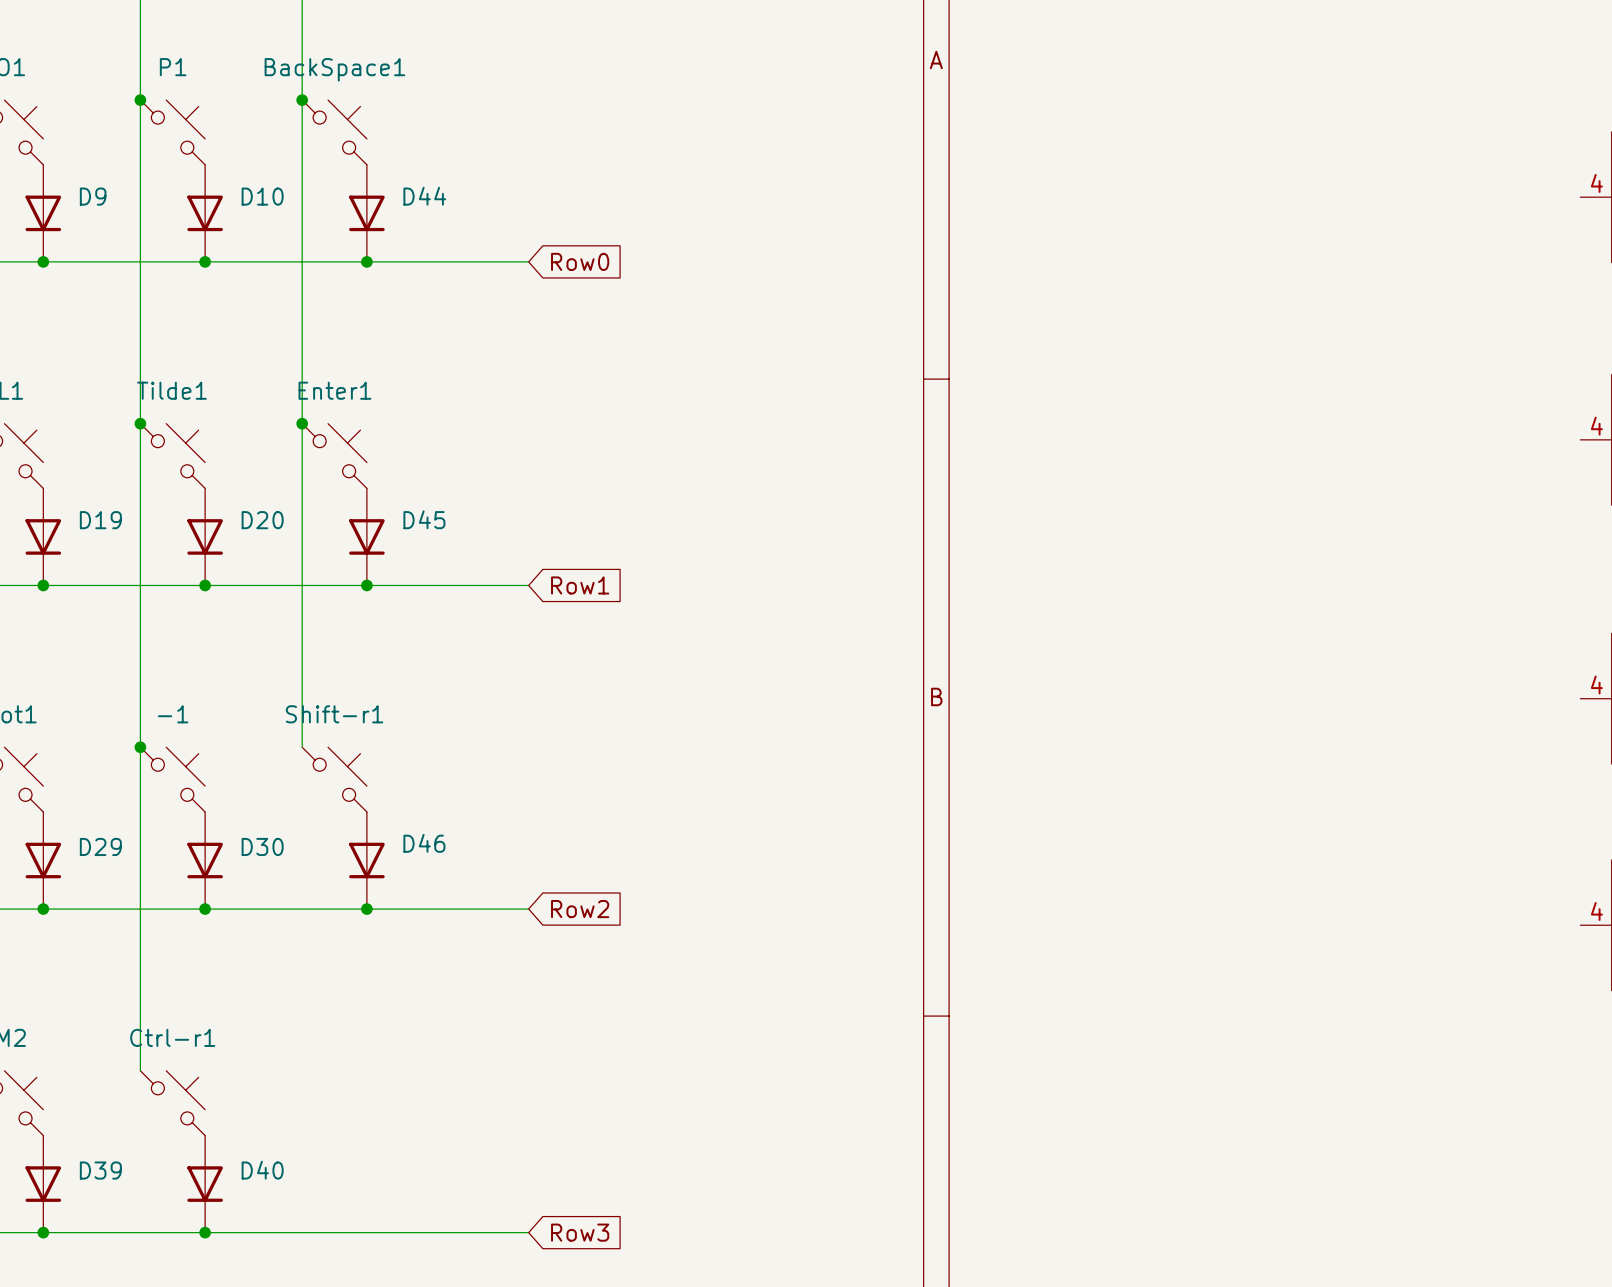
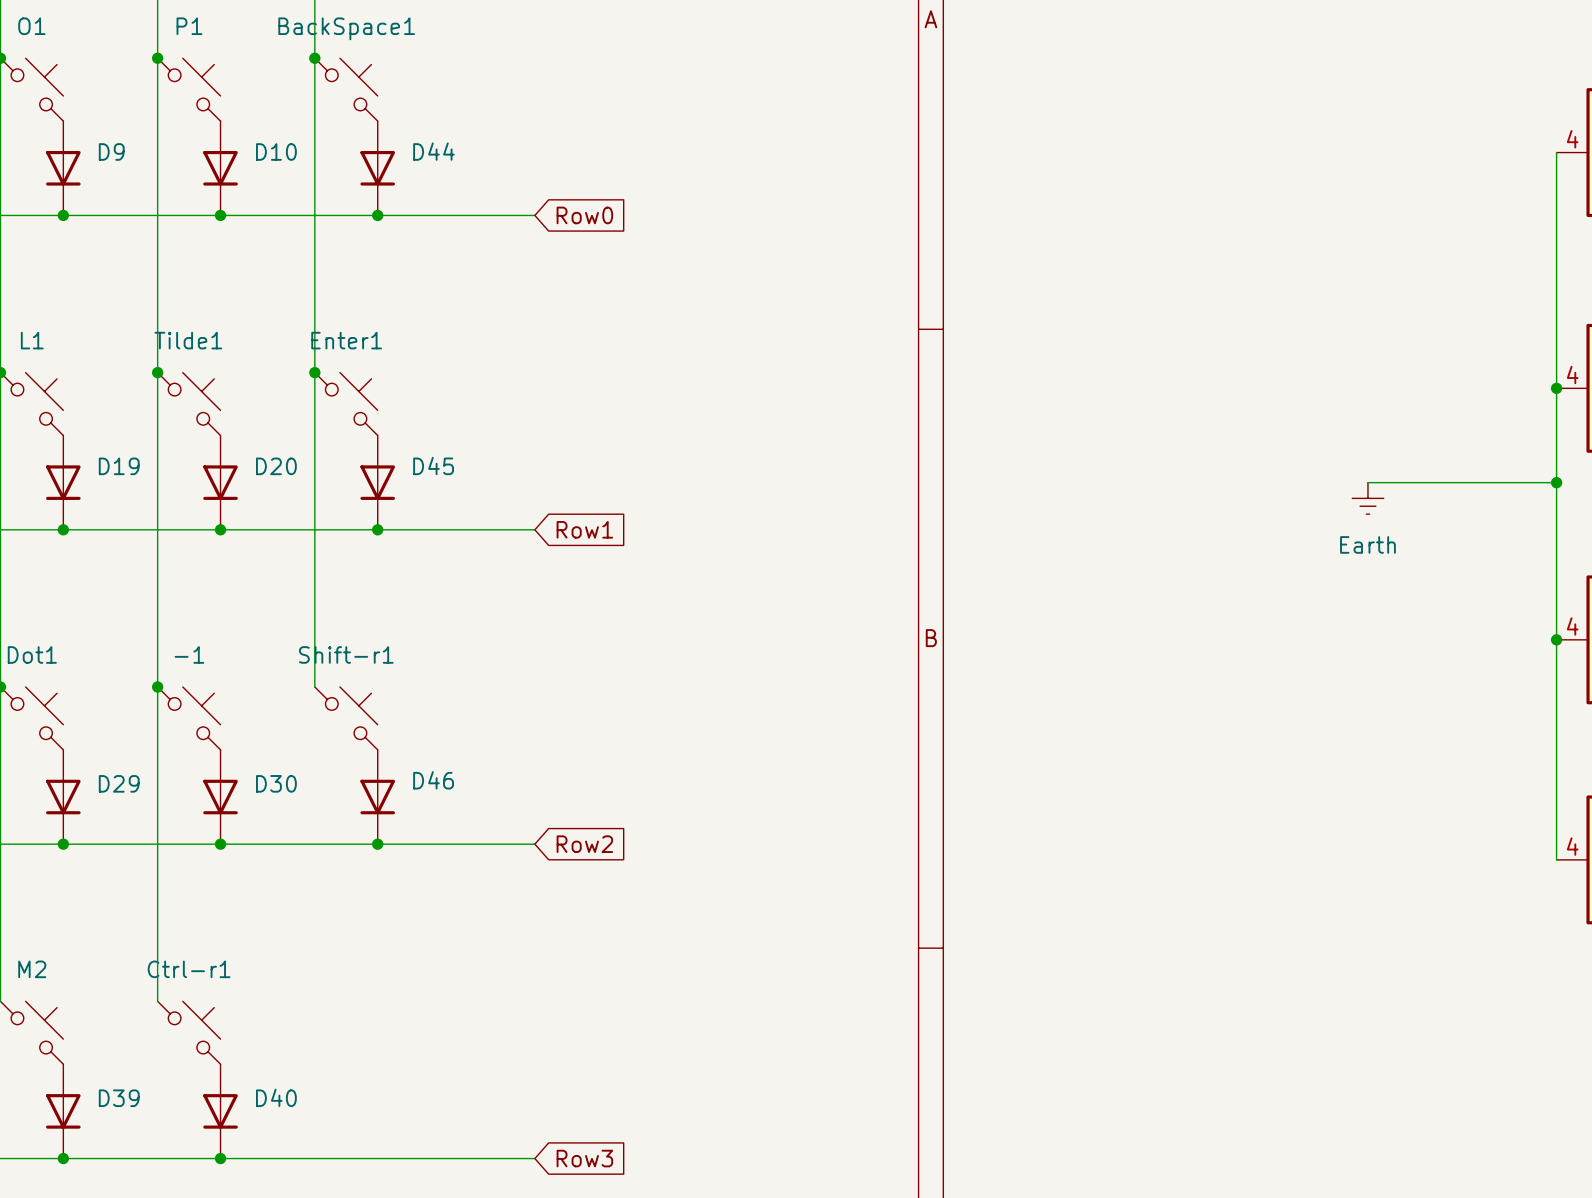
wire: none -> (1556, 152) (1556, 859)
junction: none -> (1556, 388)
wire: none -> (1367, 482) (1556, 482)
junction: none -> (1556, 482)
power symbol: none -> Earth (1367, 498)
junction: none -> (1556, 639)

